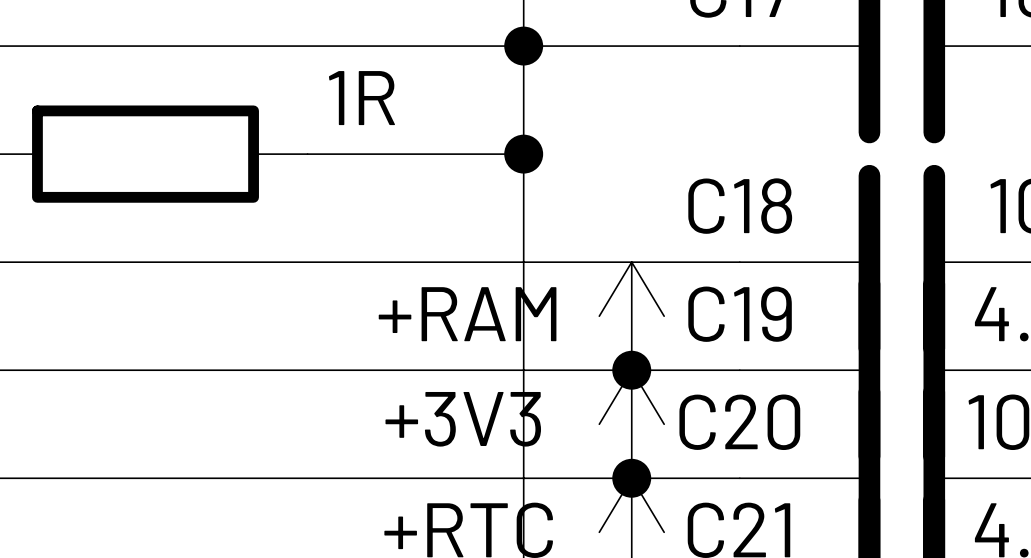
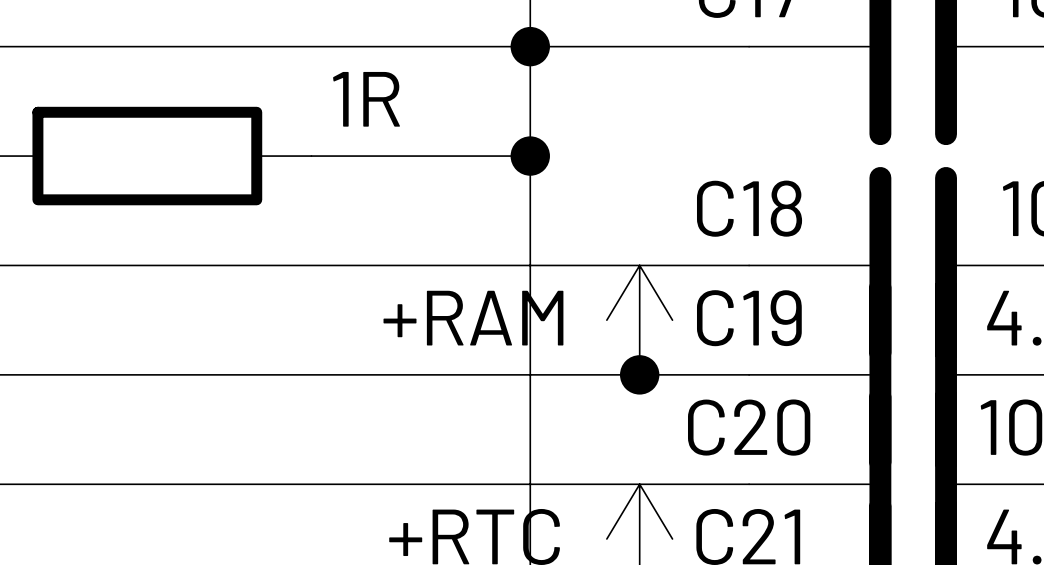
power symbol: +3V3 (631, 424) -> none
junction: (631, 478) -> none

